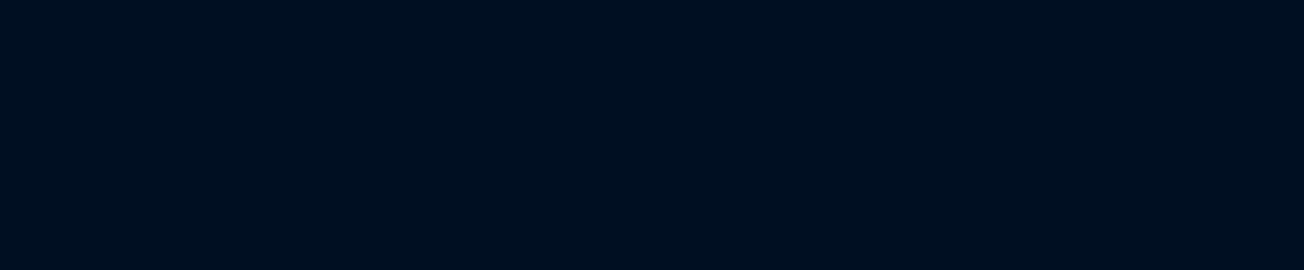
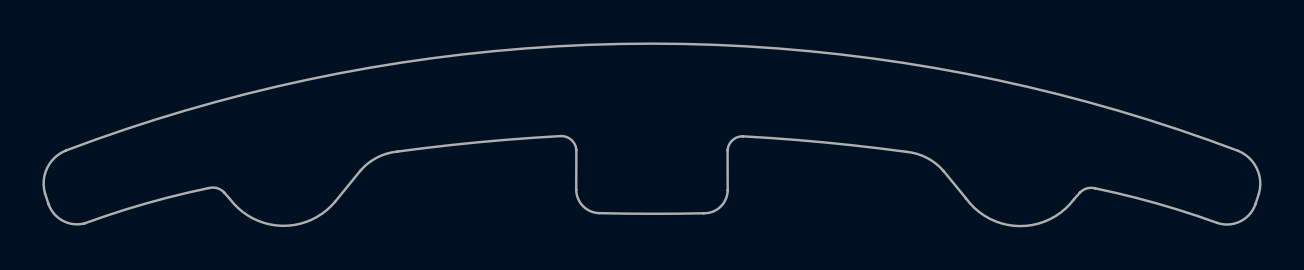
line: none -> (561, 136) (479, 142) (386, 153) (372, 160) (364, 166) (335, 201) (321, 213) (305, 222) (287, 225) (269, 224) (252, 218) (237, 207) (221, 190) (212, 187) (146, 203) (84, 223) (73, 224) (62, 220) (54, 213) (48, 204) (44, 188) (44, 175) (49, 163) (55, 157) (66, 150) (185, 110) (277, 86) (369, 67) (463, 54) (557, 46) (652, 43) (746, 46) (840, 54) (934, 67) (1027, 86) (1148, 119) (1238, 150) (1249, 157) (1254, 164) (1259, 176) (1260, 184) (1255, 203) (1250, 212) (1240, 221) (1230, 224) (1220, 223) (1156, 203) (1091, 187) (1082, 190) (1065, 208) (1050, 219) (1032, 225) (1013, 225) (995, 221) (978, 211) (939, 167) (926, 157) (916, 153) (824, 142) (742, 136) (733, 139) (728, 146) (727, 195) (723, 202) (716, 209) (703, 213) (599, 213) (585, 208) (578, 198) (576, 189) (576, 148) (570, 138) (561, 136)

